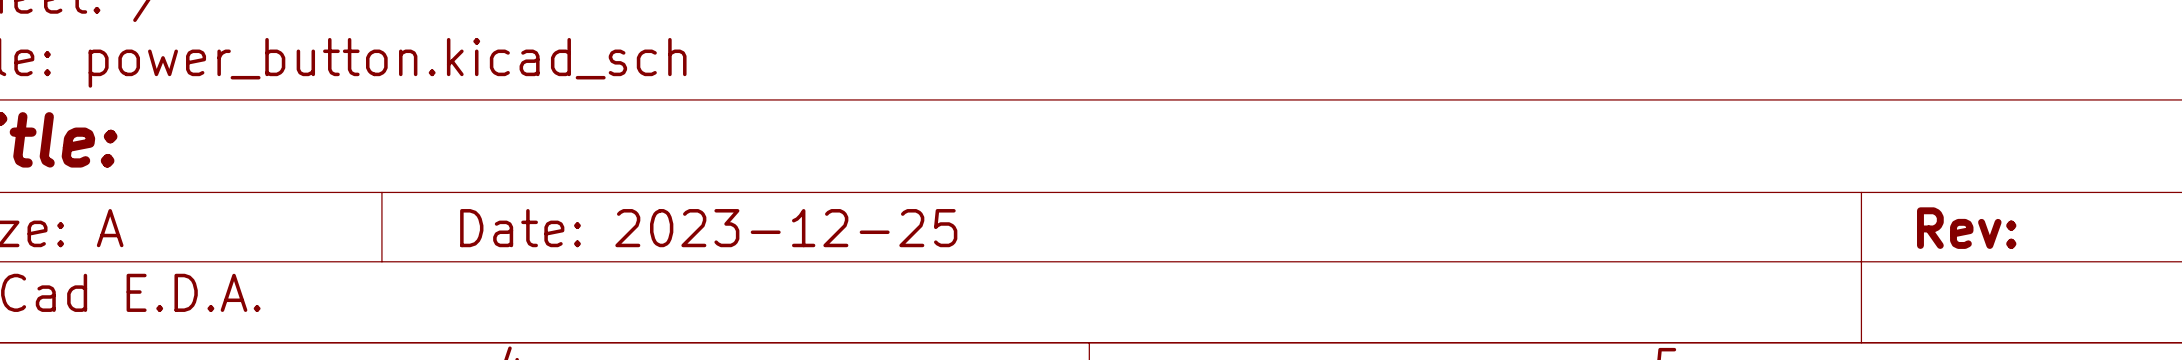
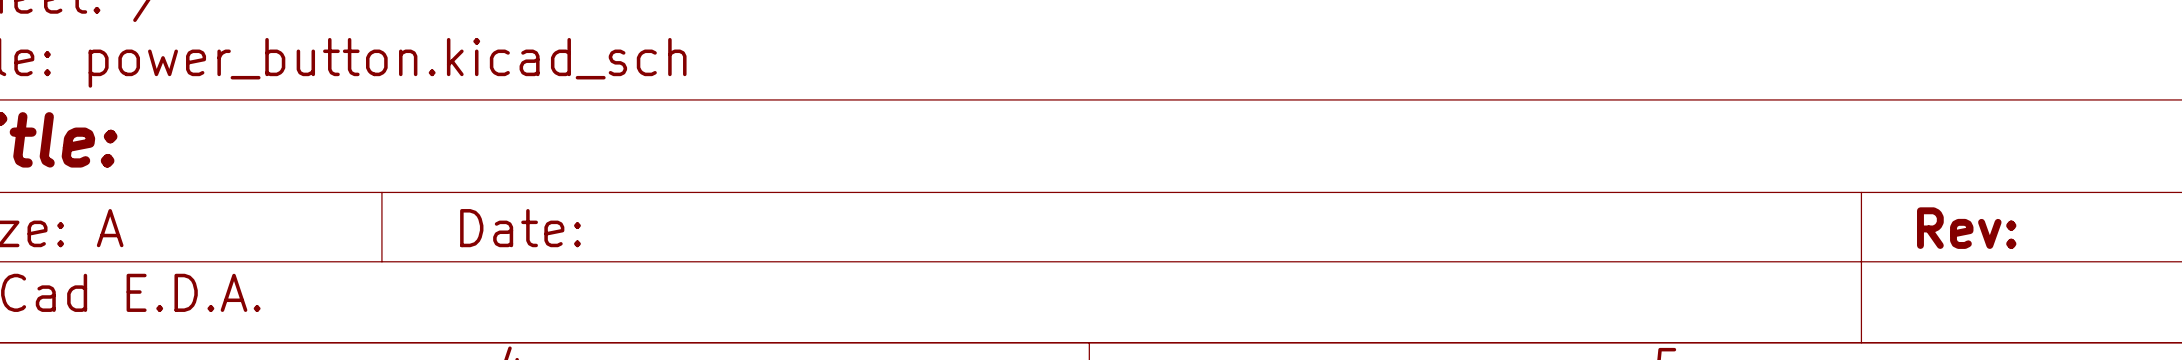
title block: Date: 2023-12-25 (708, 228) -> Date: (520, 228)

